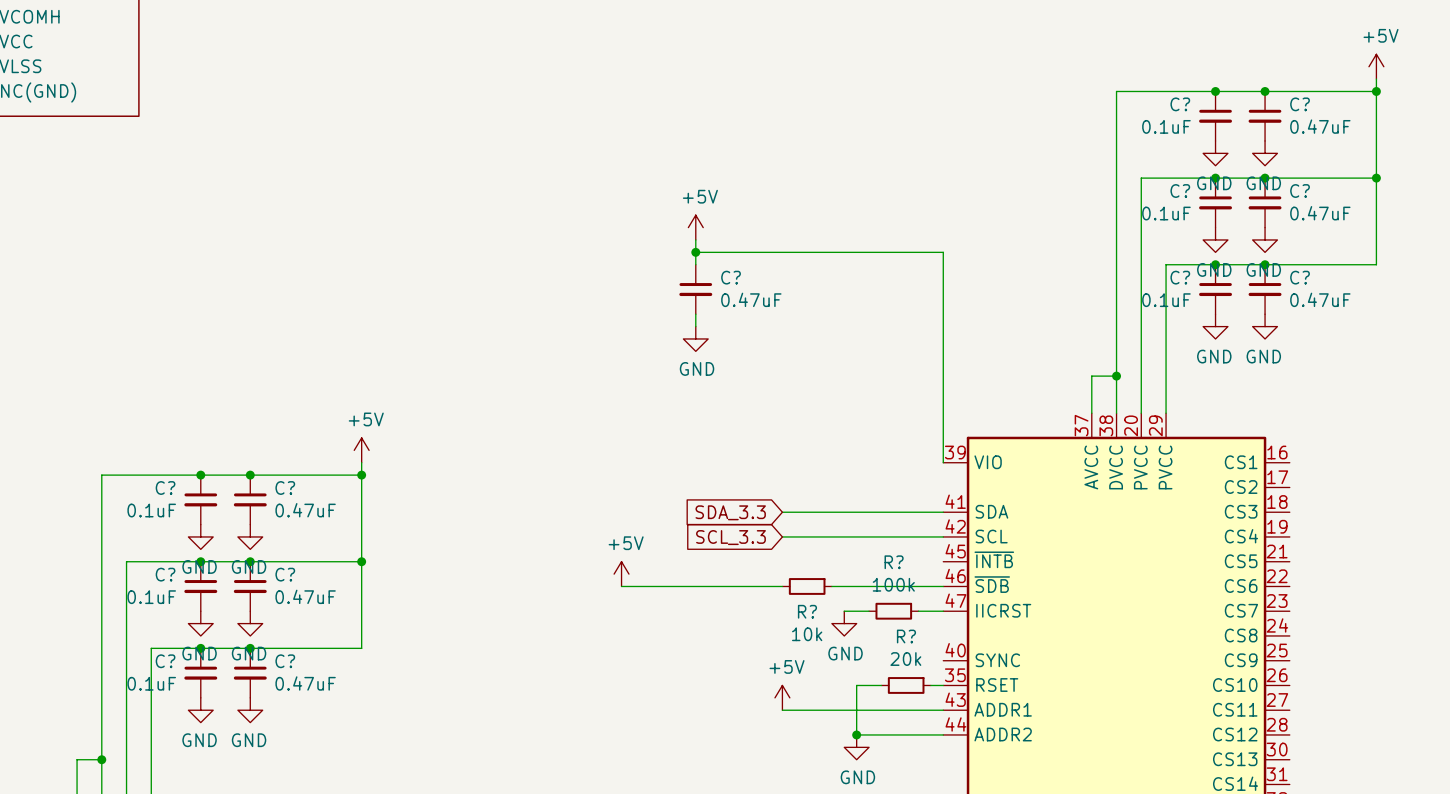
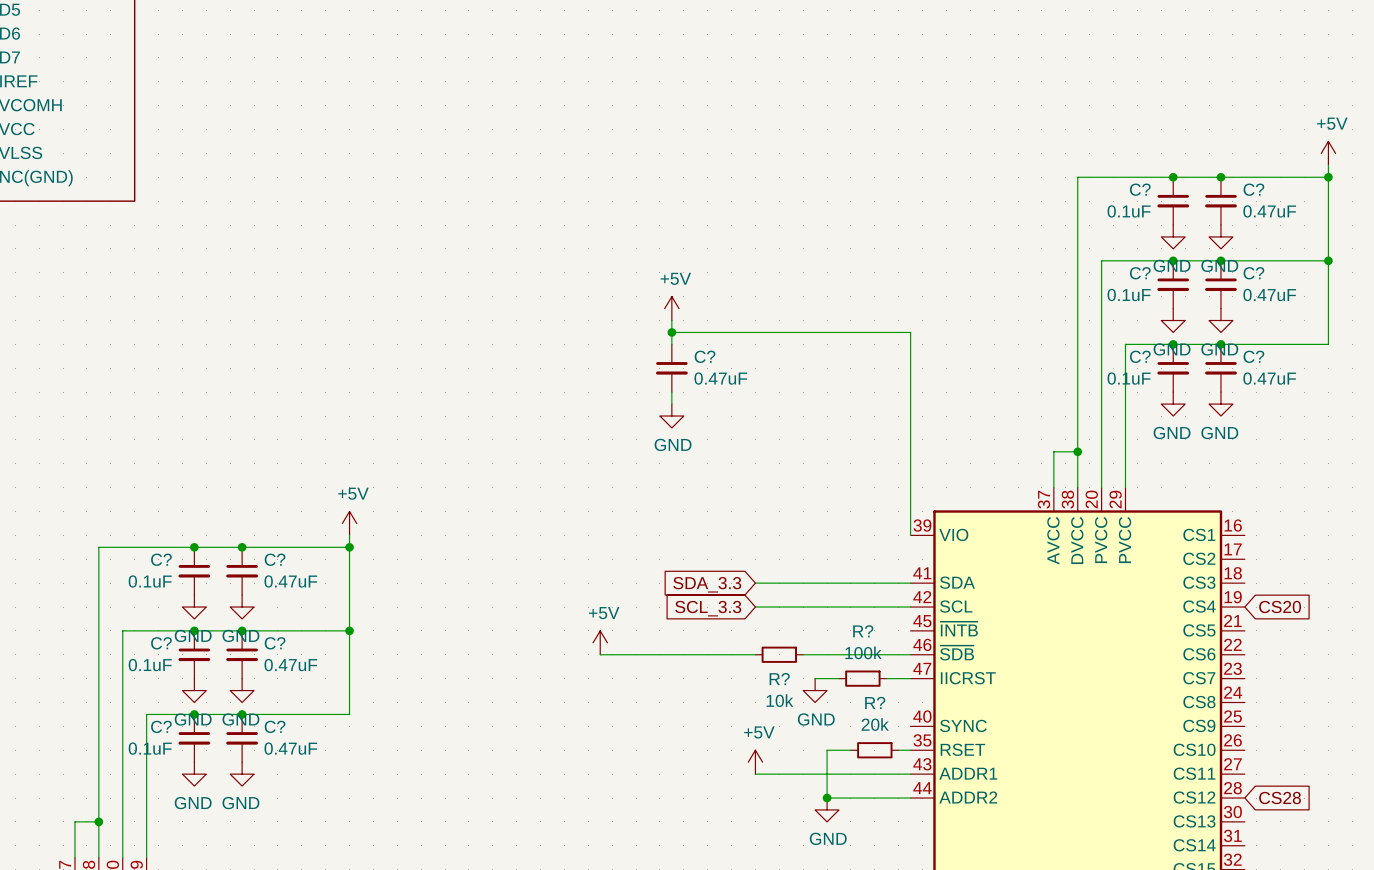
global label: none -> CS20 (1280, 607)
global label: none -> CS28 (1280, 798)

